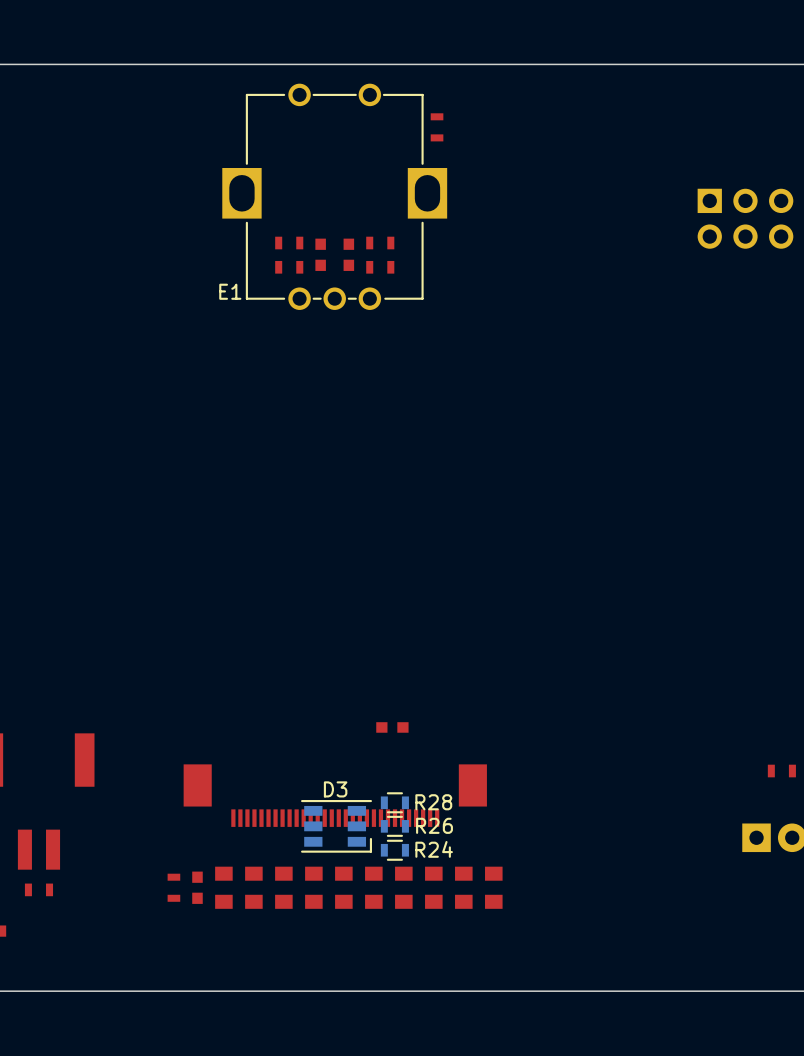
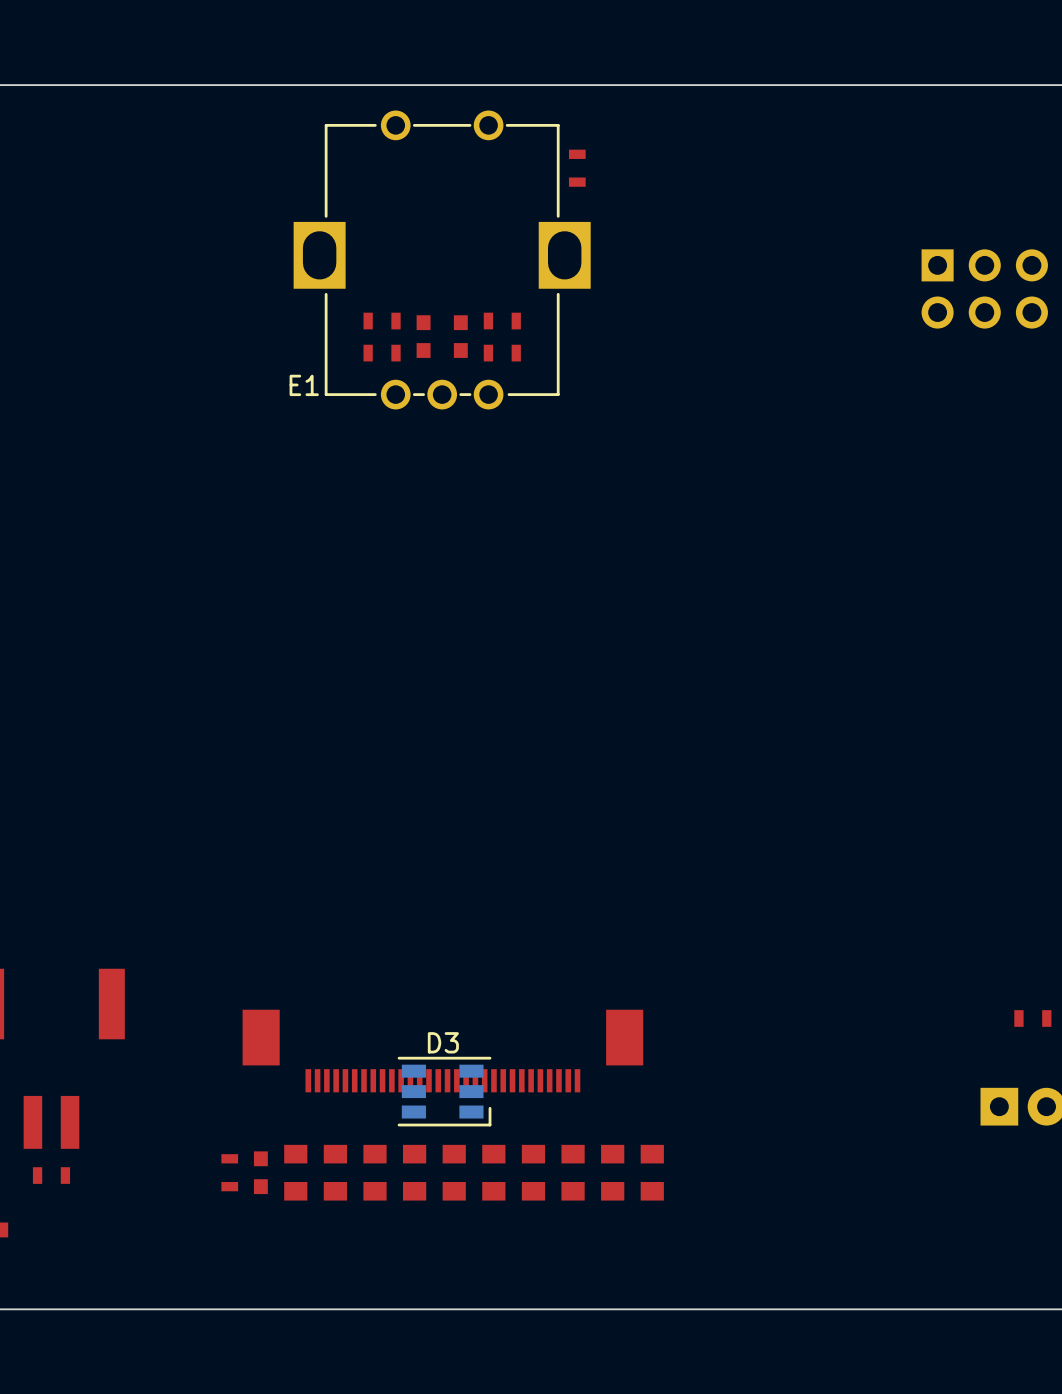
part: (392, 727) -> none
R28: (394, 802) -> none
R26: (394, 826) -> none
R24: (394, 850) -> none

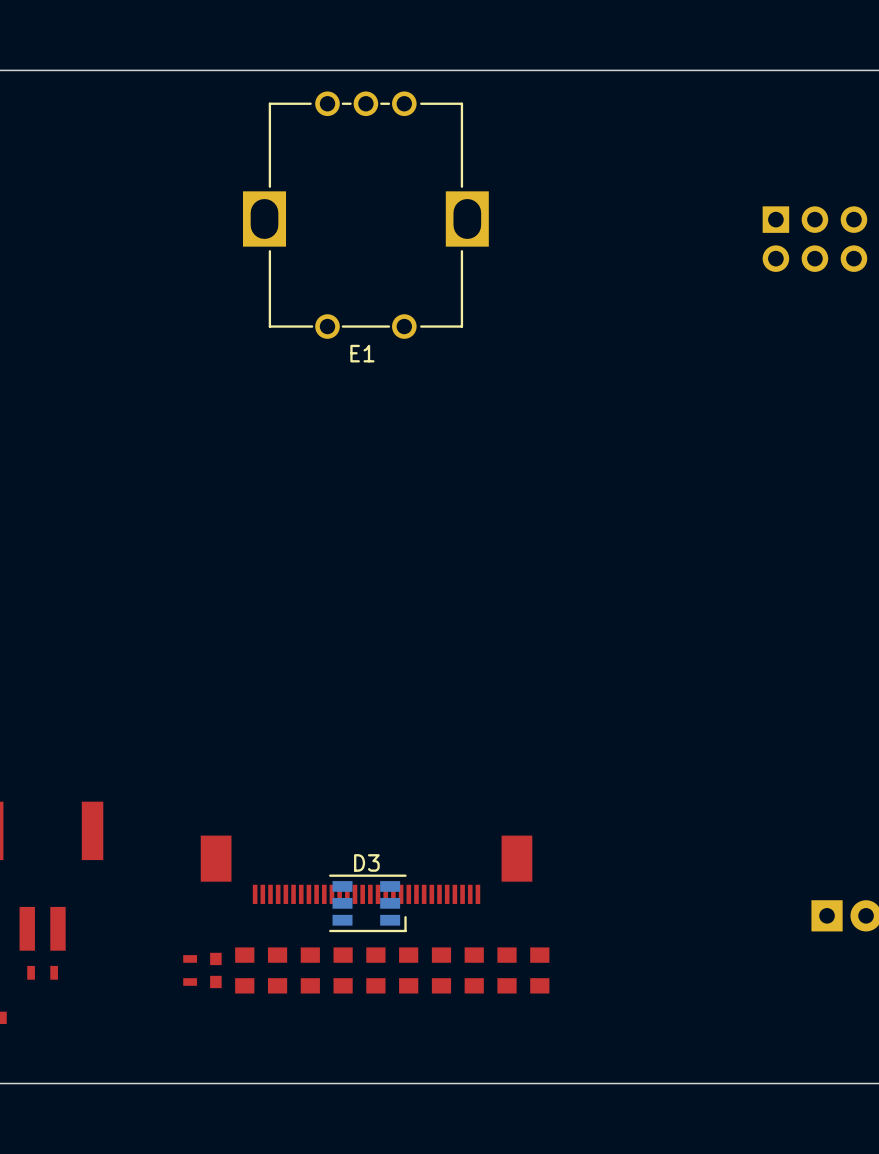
part: (577, 168) -> none
E1 rotation: 0° (442, 259) -> 180° (365, 215)
part: (382, 321) -> none
part: (502, 321) -> none
part: (423, 336) -> none
part: (460, 336) -> none
part: (382, 353) -> none
part: (502, 353) -> none
E1 name position: E1 (304, 385) -> E1 (362, 353)
part: (1032, 1018) -> none

